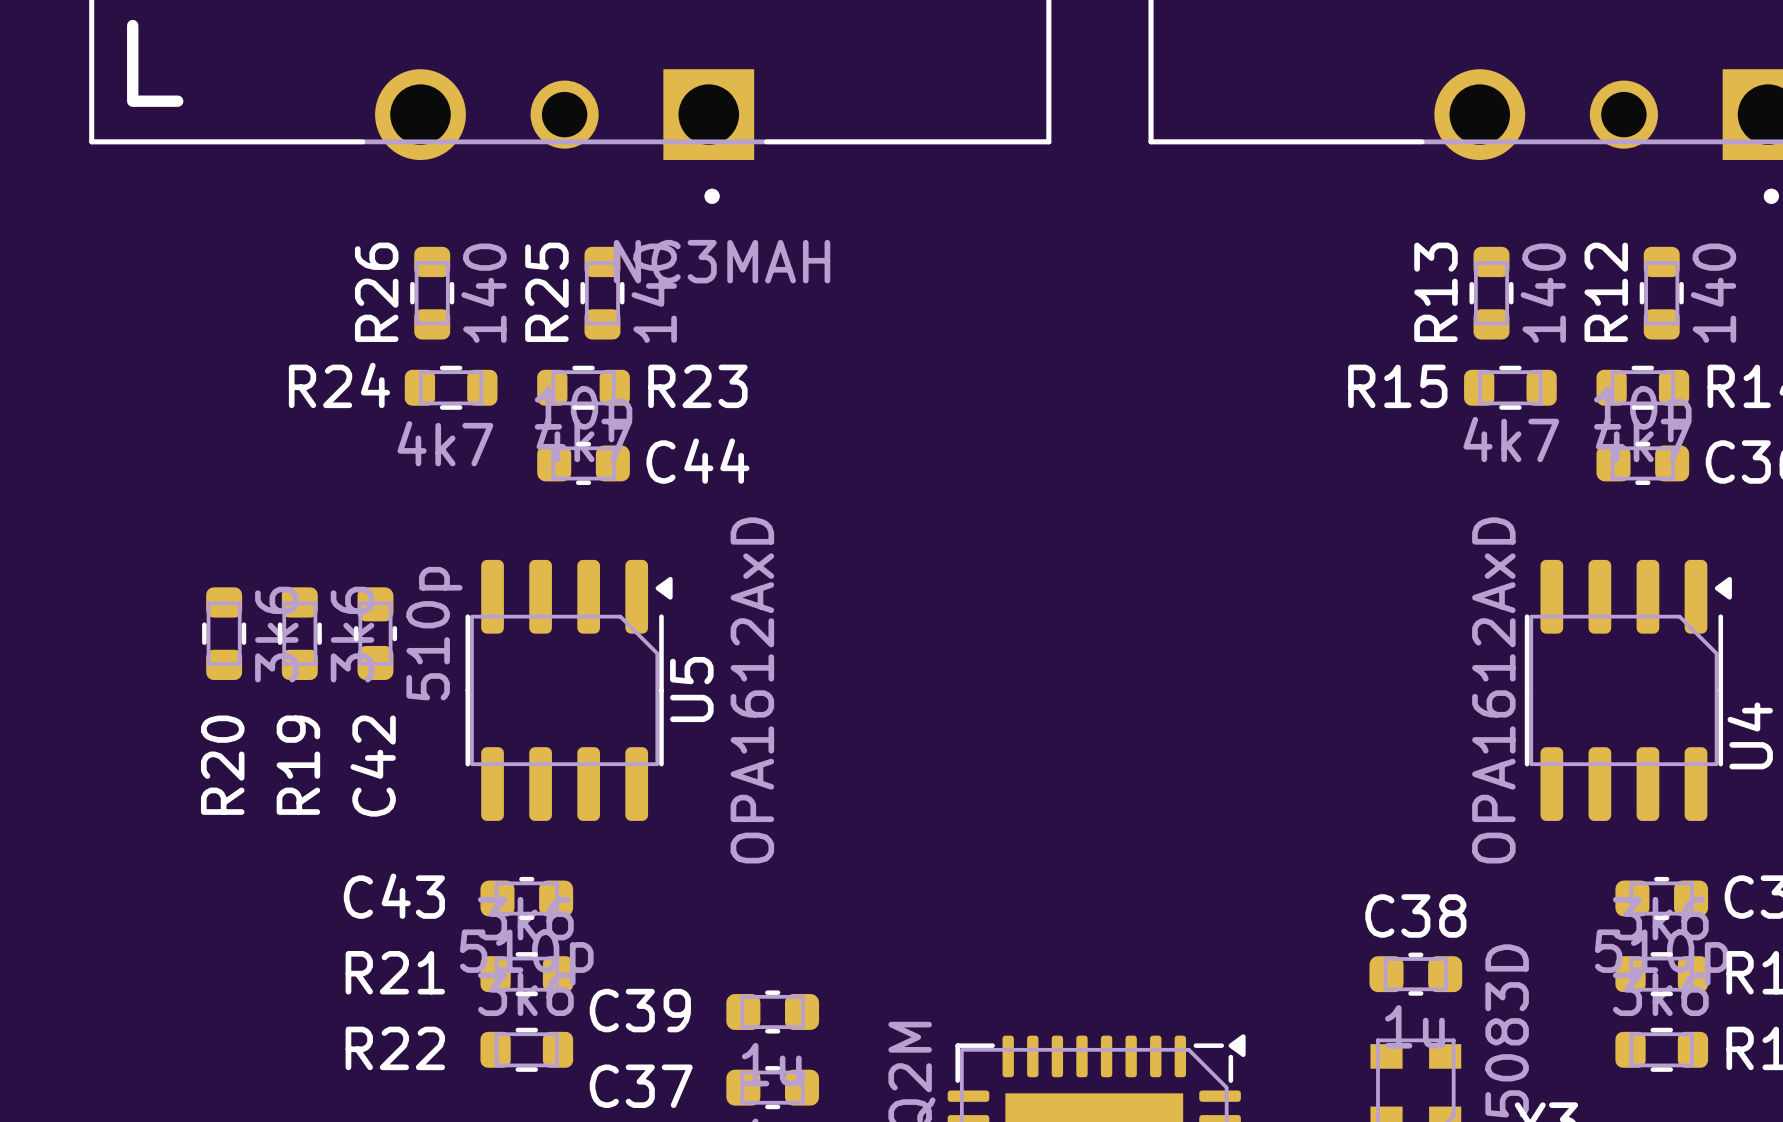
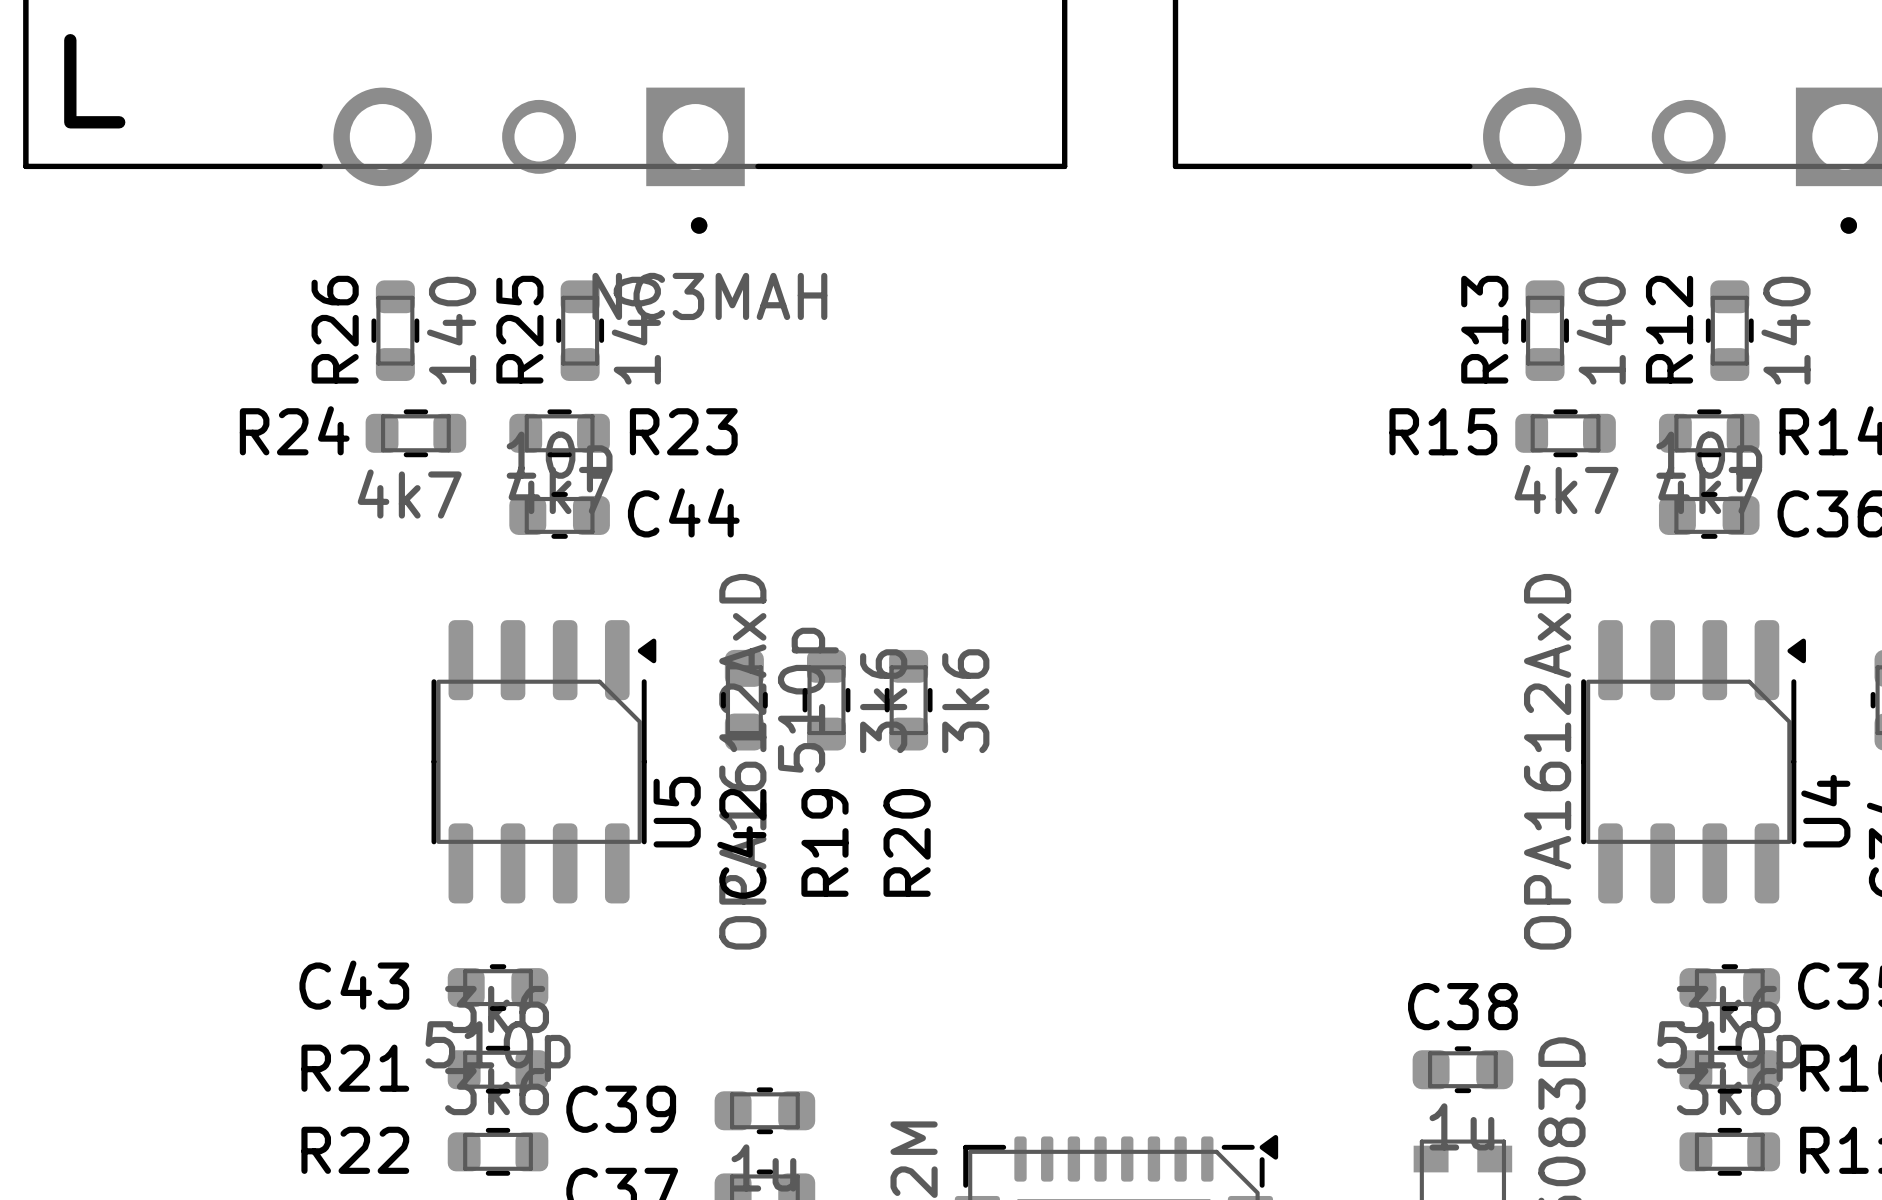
R20 position: (224, 633) -> (908, 700)
R19 position: (299, 633) -> (826, 700)
C42 position: (375, 633) -> (744, 700)
U5 name position: U5 (691, 689) -> U5 (677, 812)

